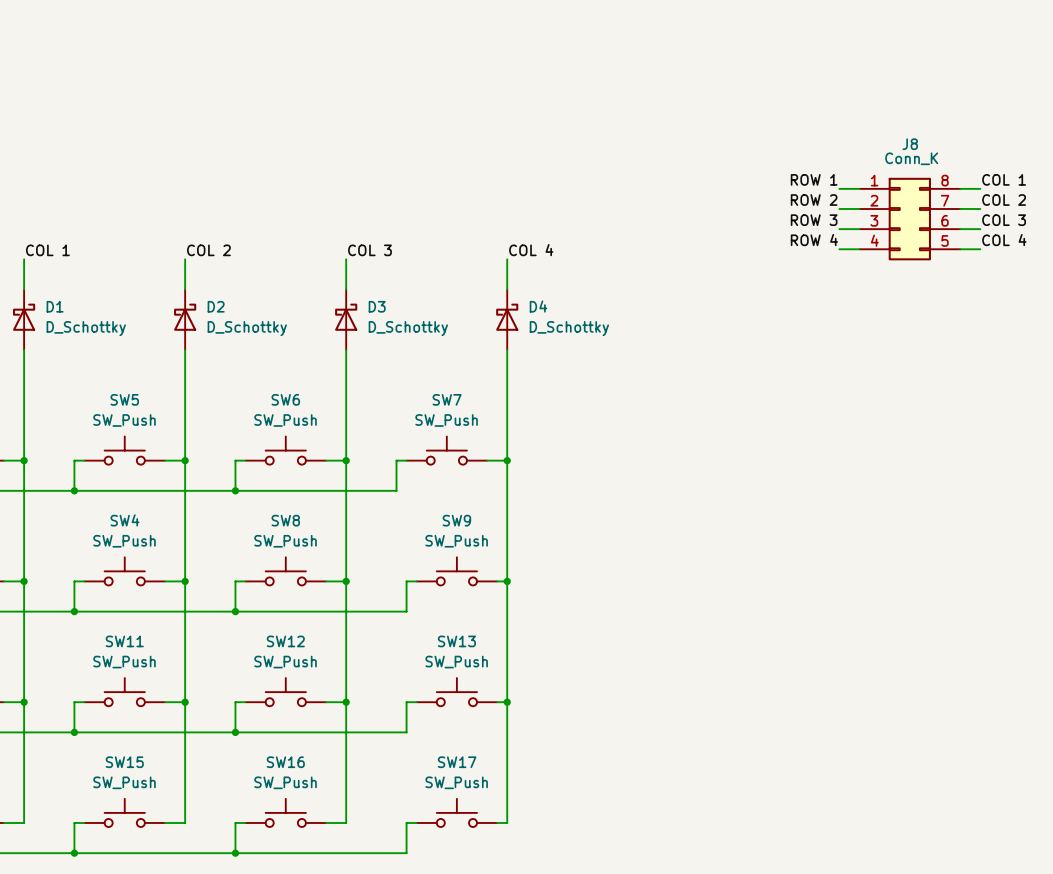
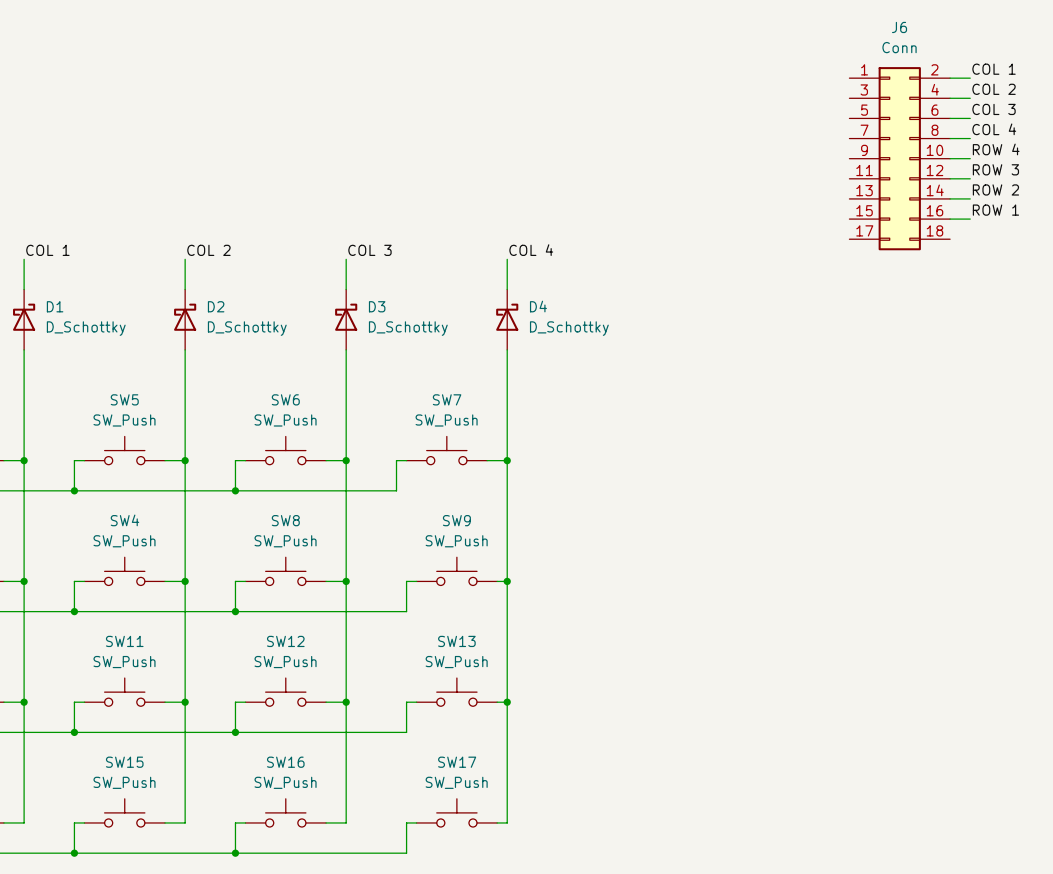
wire: none -> (950, 78) (970, 78)
J6: none -> Conn (899, 158)
label position: ROW 1 (814, 179) -> ROW 1 (995, 210)
label position: COL 1 (1004, 179) -> COL 1 (994, 69)
wire: (839, 188) (859, 188) -> (950, 138) (970, 138)
wire: (960, 188) (980, 188) -> (950, 158) (970, 158)
label position: ROW 2 (814, 200) -> ROW 2 (995, 189)
label position: COL 2 (1004, 200) -> COL 2 (994, 89)
wire: (839, 209) (859, 209) -> (950, 118) (970, 118)
wire: (960, 209) (980, 209) -> (950, 178) (970, 178)
J8: Conn_K (909, 219) -> none
label position: ROW 3 (814, 220) -> ROW 3 (995, 169)
label position: COL 3 (1004, 220) -> COL 3 (994, 109)
wire: (839, 229) (859, 229) -> (950, 98) (970, 98)
wire: (960, 229) (980, 229) -> (950, 198) (970, 198)
label position: ROW 4 (814, 240) -> ROW 4 (996, 149)
label position: COL 4 (1004, 240) -> COL 4 (994, 129)
wire: (839, 249) (859, 249) -> none
wire: (960, 249) (980, 249) -> (950, 219) (970, 219)

